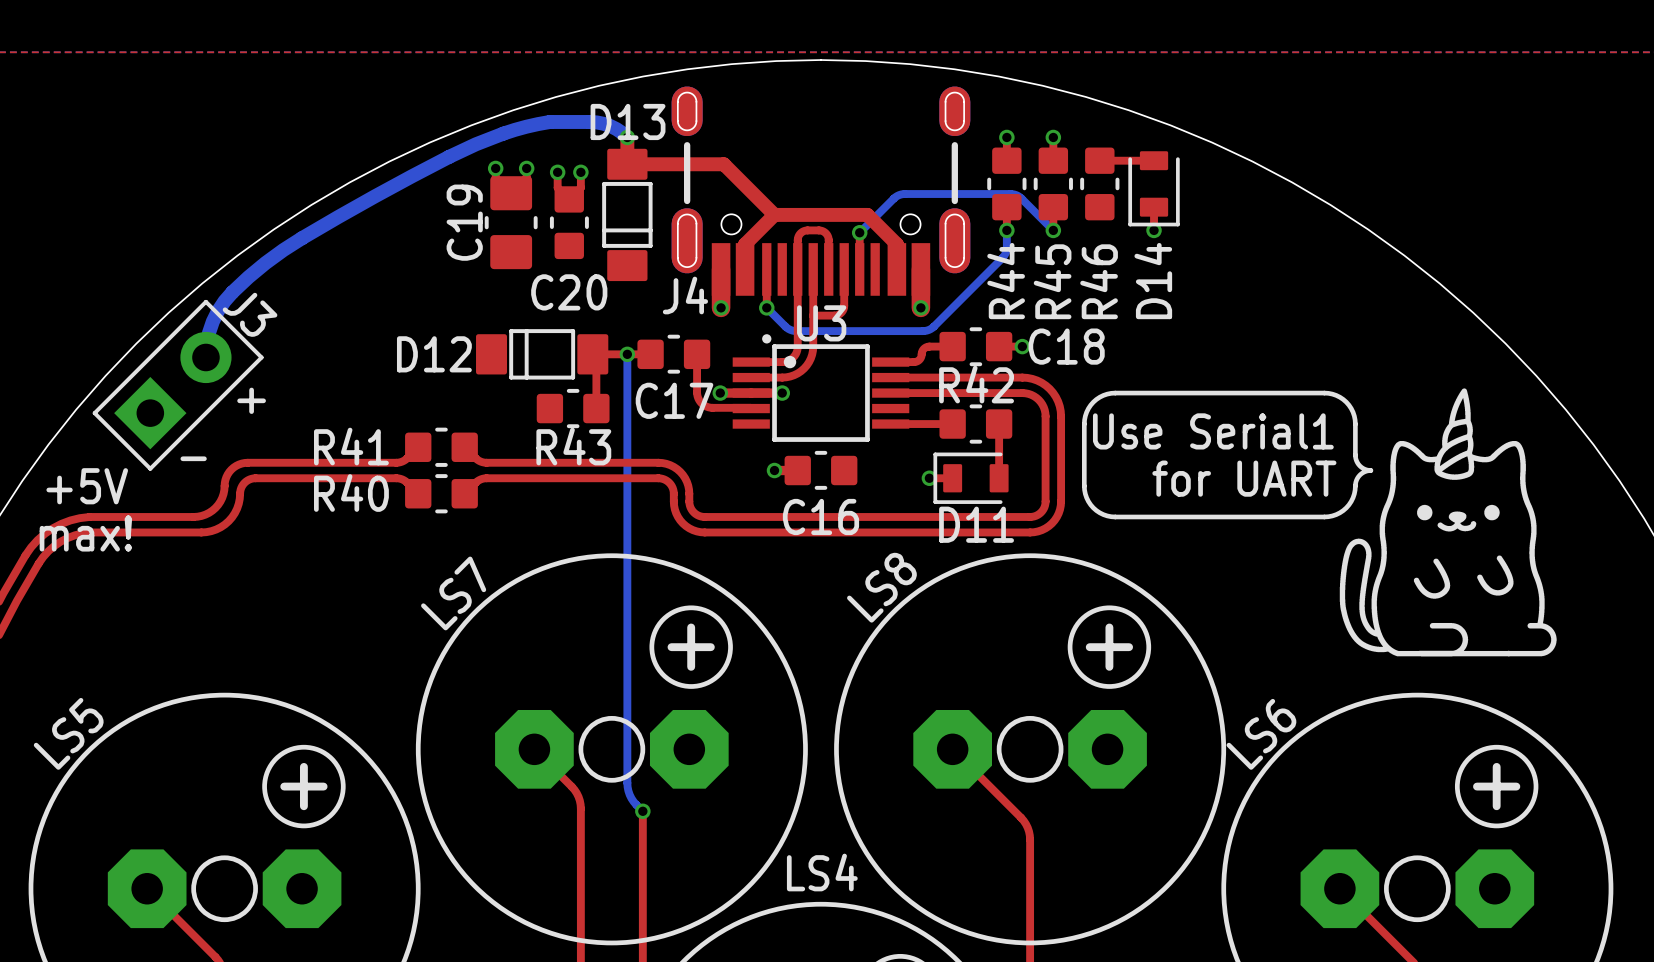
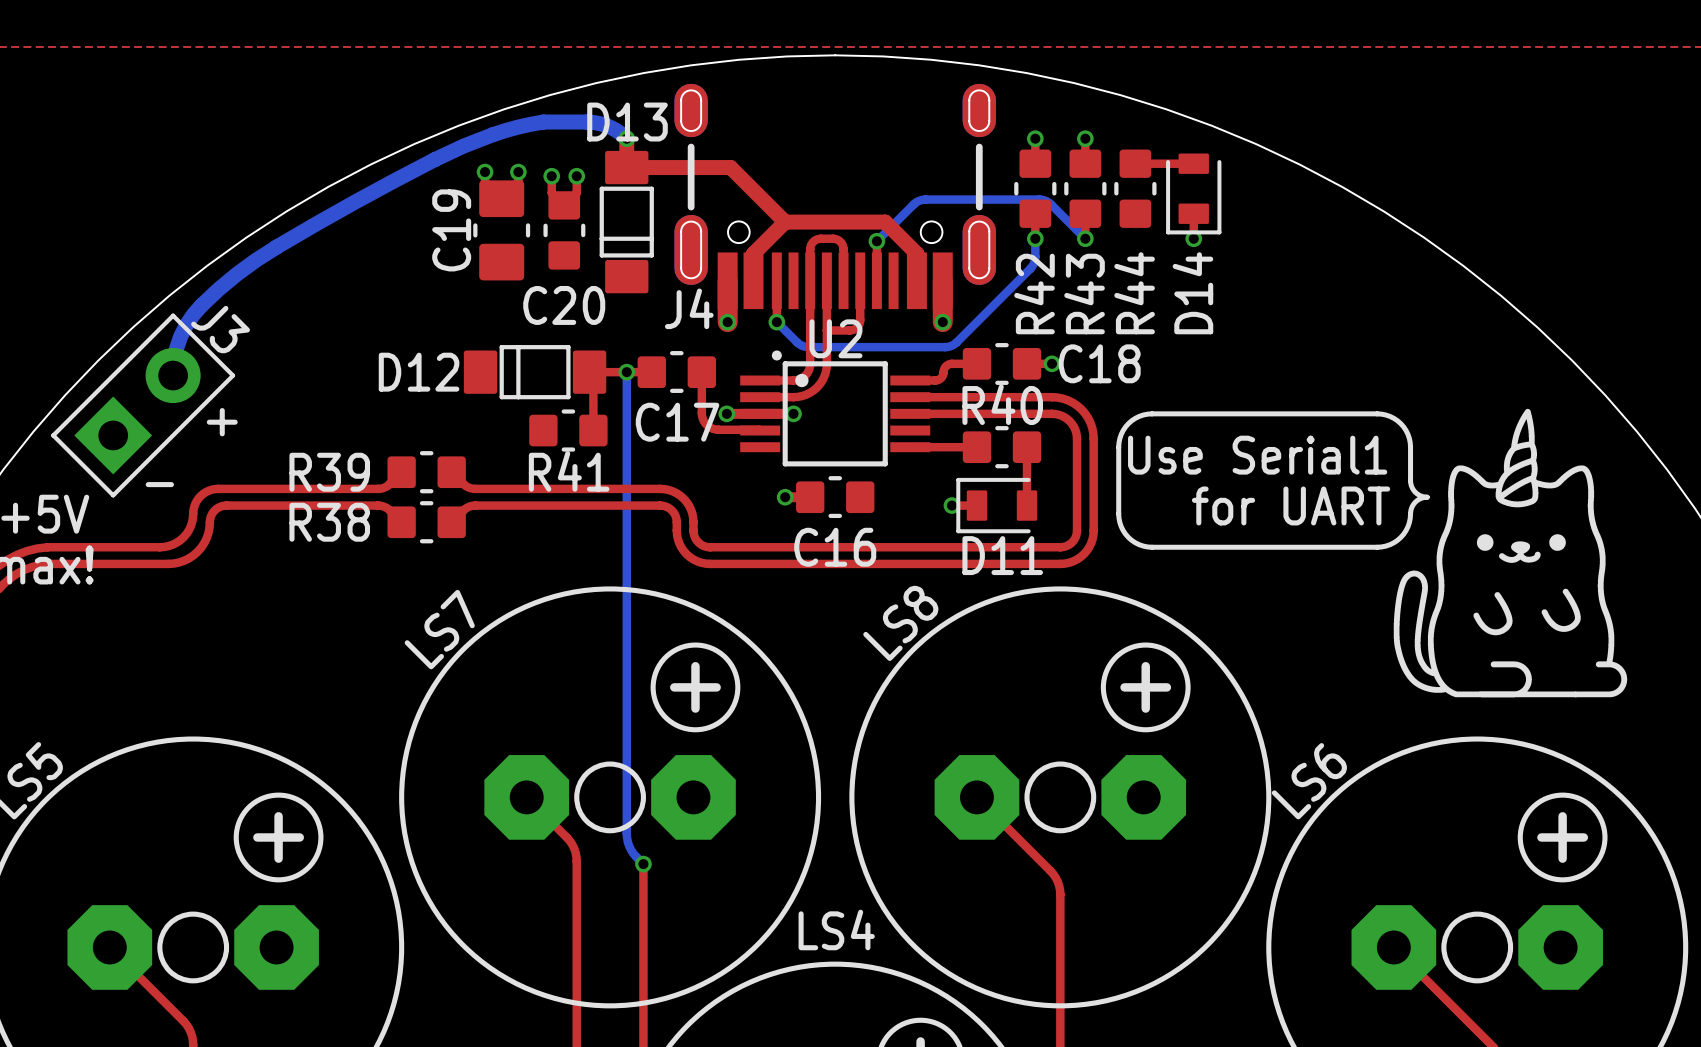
R44 name: R44 (1006, 281) -> R42 (1034, 294)
R45 name: R45 (1052, 281) -> R43 (1084, 294)
R46 name: R46 (1099, 281) -> R44 (1134, 293)
U3 name: U3 (821, 323) -> U2 (835, 338)
R42 name: R42 (976, 384) -> R40 (1002, 404)
R41 name: R41 (351, 446) -> R39 (329, 472)
R43 name: R43 (573, 446) -> R41 (569, 471)
R40 name: R40 (351, 492) -> R38 (329, 522)

